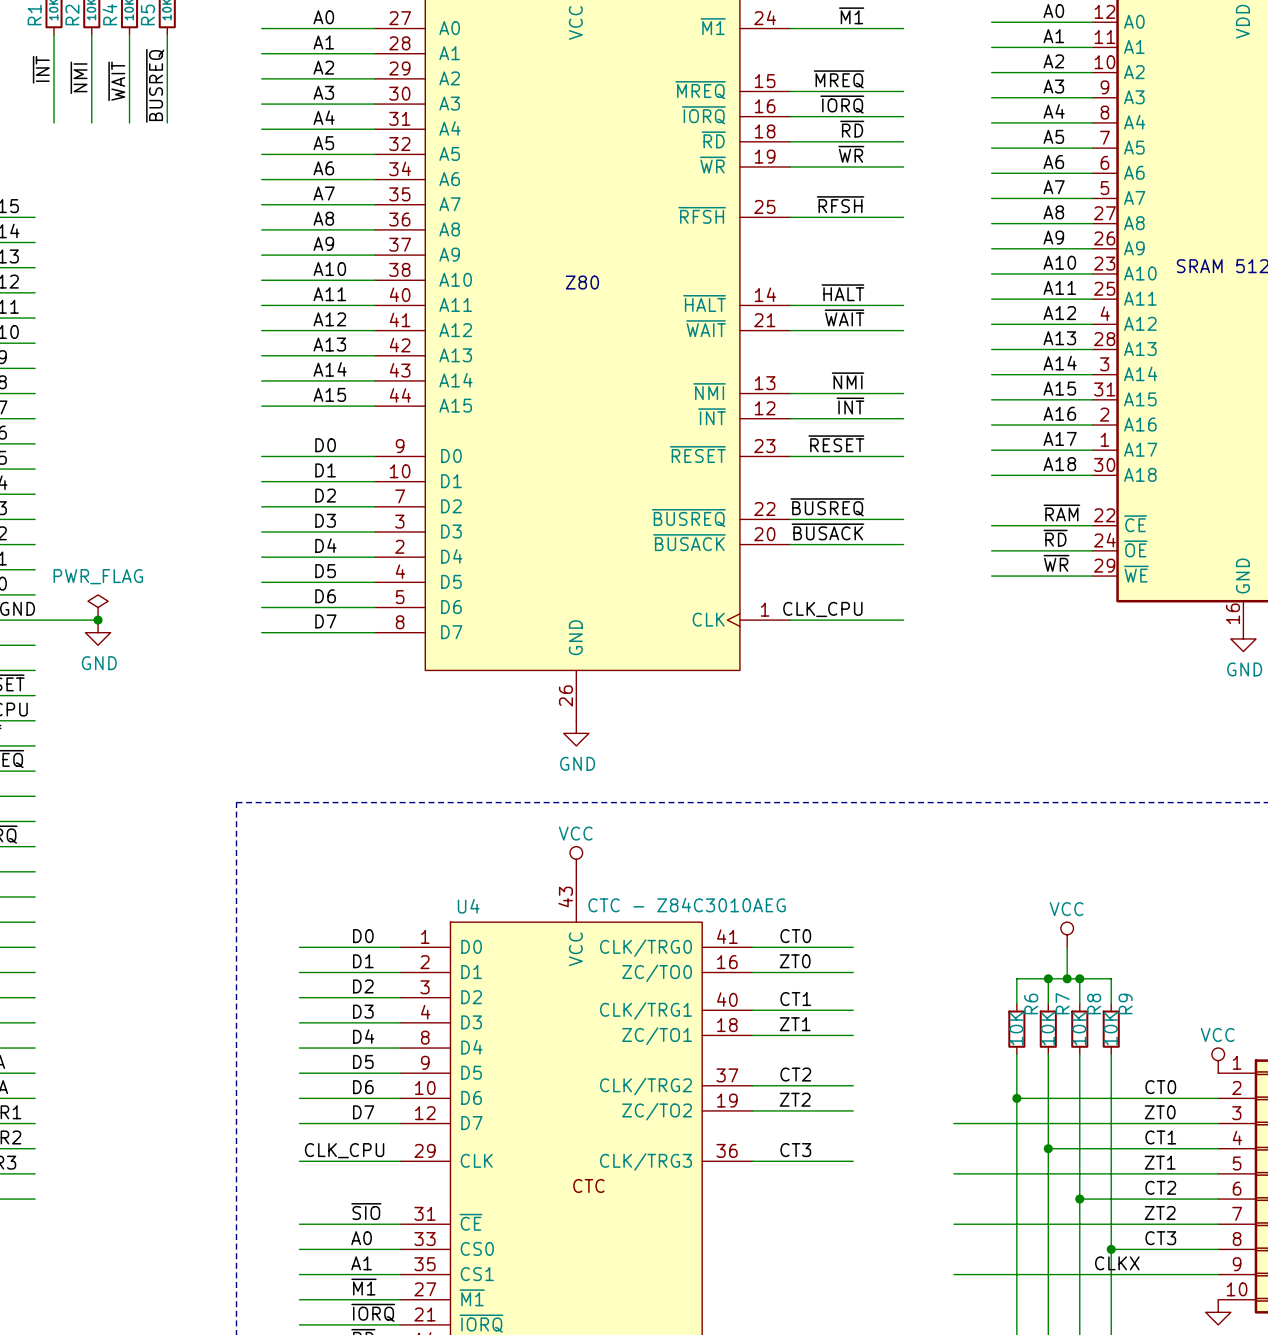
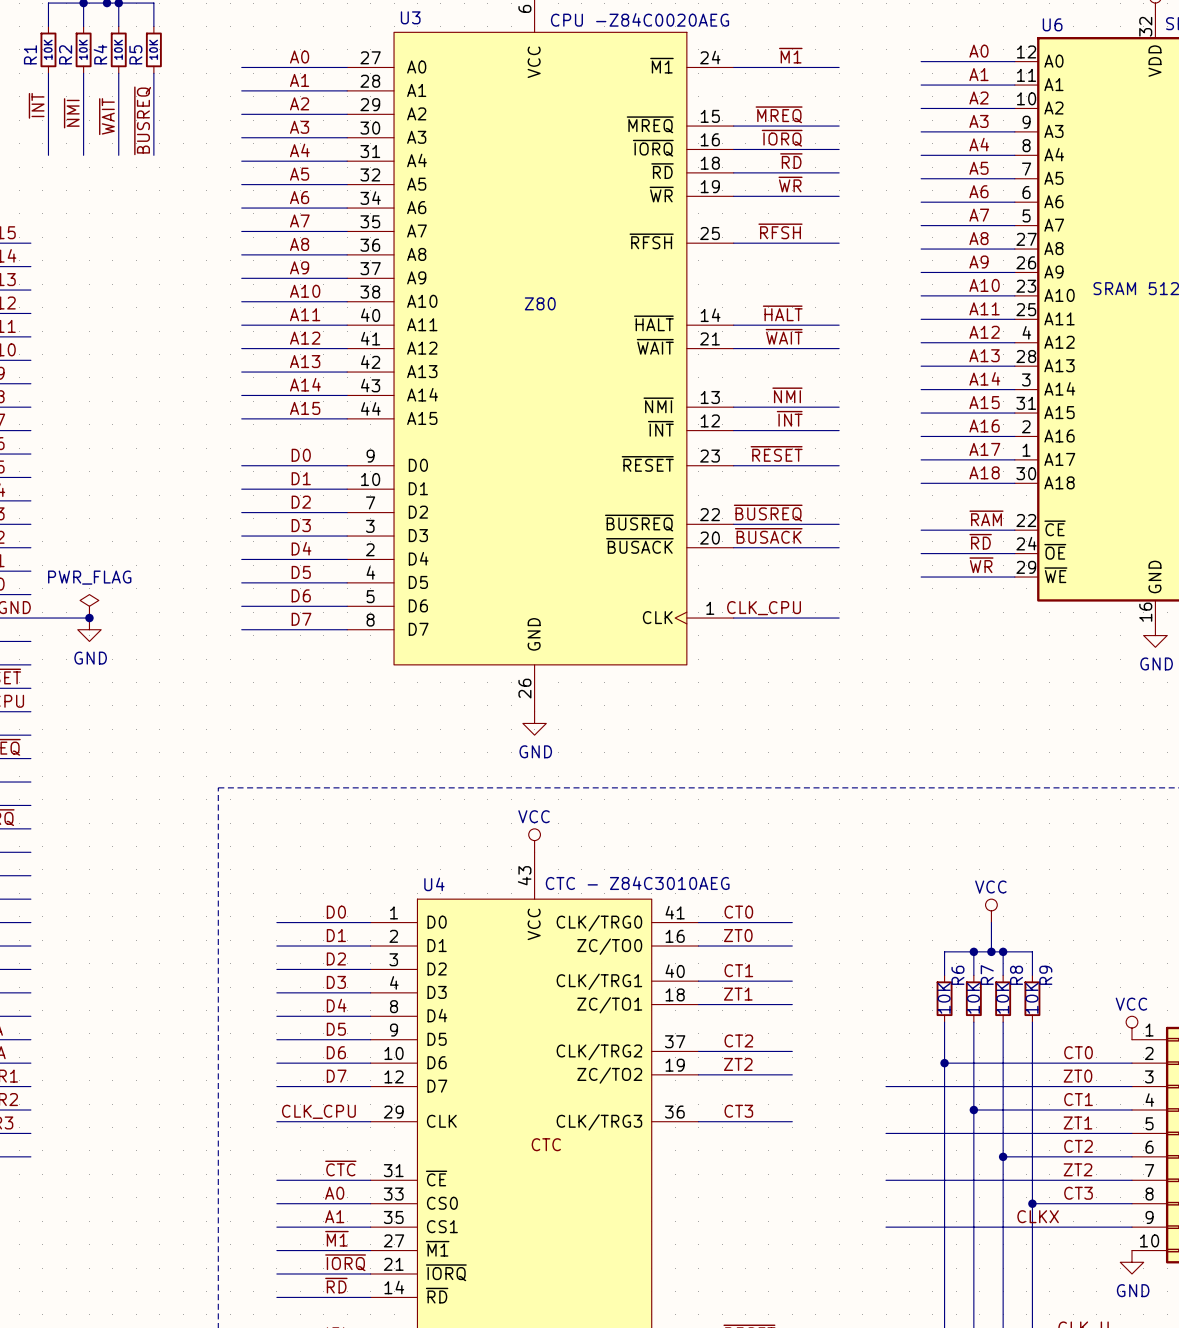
label: ~{SIO} (366, 1211) -> ~{CTC} (340, 1168)

